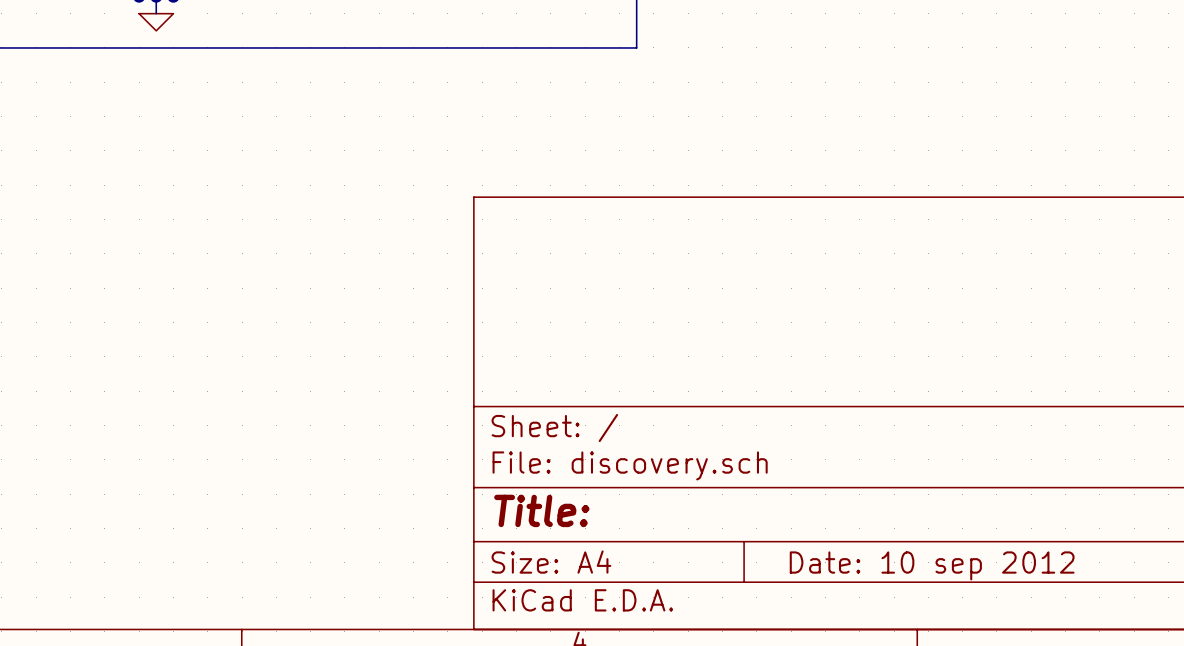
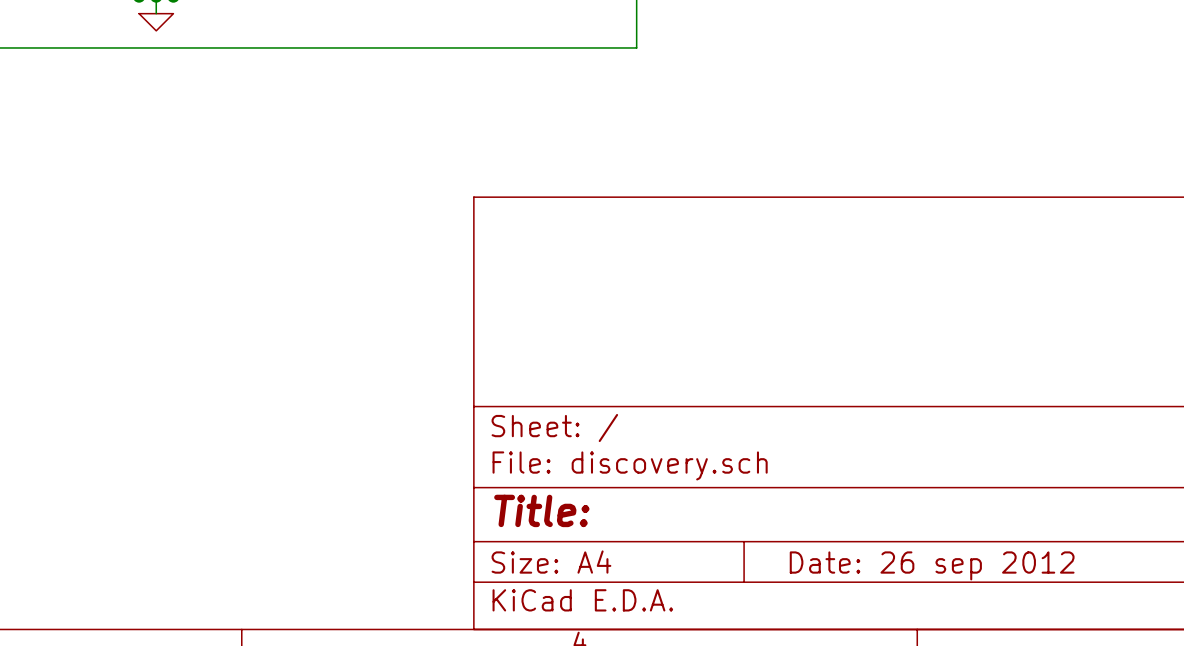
title block: Date: 10 sep 2012 (932, 565) -> Date: 26 sep 2012 (932, 565)

